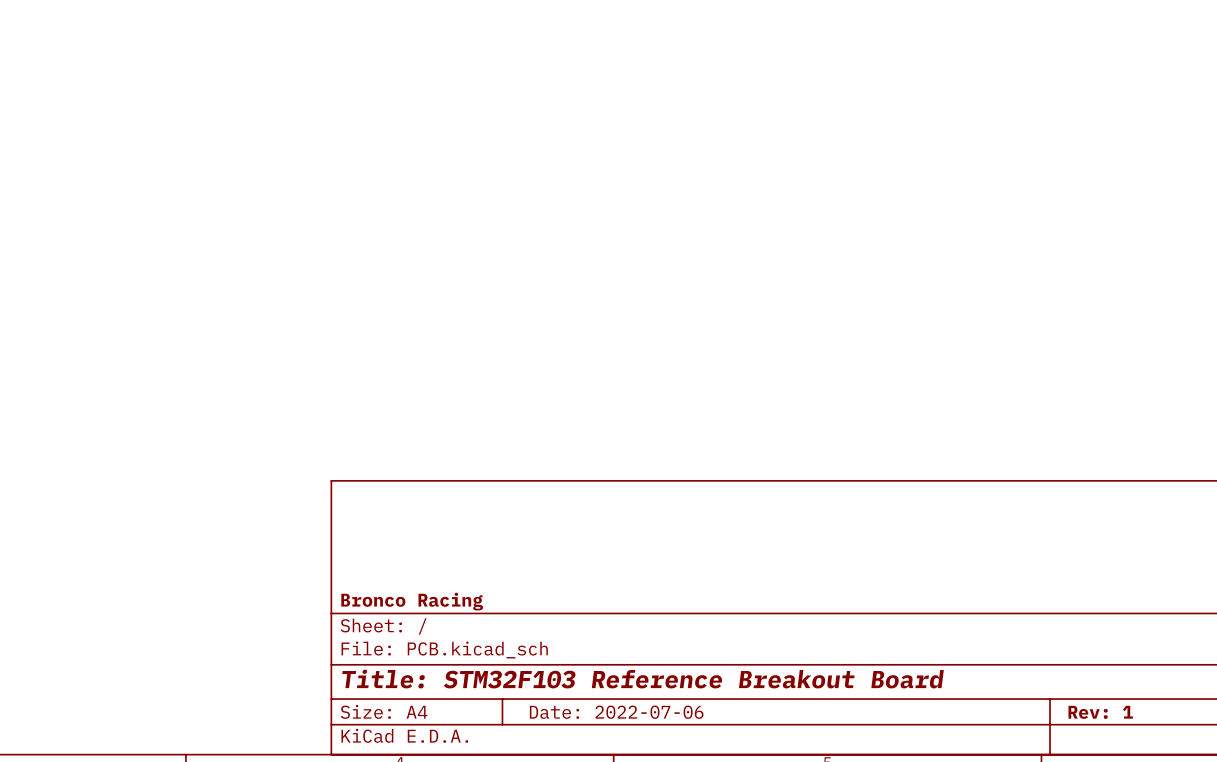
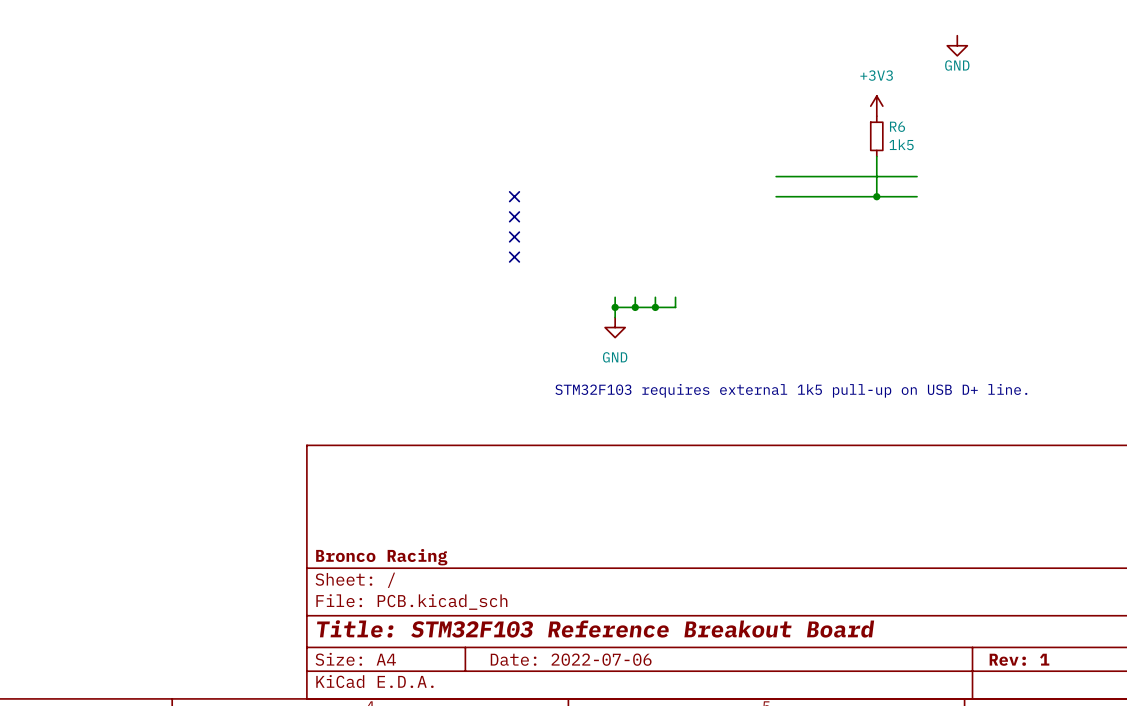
power symbol: none -> GND (957, 45)
power symbol: none -> +3V3 (876, 106)
R6: none -> 1k5 (876, 136)
wire: none -> (876, 156) (876, 196)
wire: none -> (776, 176) (917, 176)
no-connect mark: none -> (514, 196)
wire: none -> (776, 196) (917, 196)
junction: none -> (876, 196)
no-connect mark: none -> (514, 216)
no-connect mark: none -> (514, 236)
no-connect mark: none -> (514, 257)
wire: none -> (615, 297) (615, 317)
wire: none -> (635, 297) (635, 307)
wire: none -> (655, 297) (655, 307)
wire: none -> (675, 297) (675, 307) (615, 307)
junction: none -> (615, 307)
junction: none -> (635, 307)
junction: none -> (655, 307)
power symbol: none -> GND (615, 327)
text: none -> STM32F103 requires external 1k5 pull-up on USB D+ line. (791, 390)

